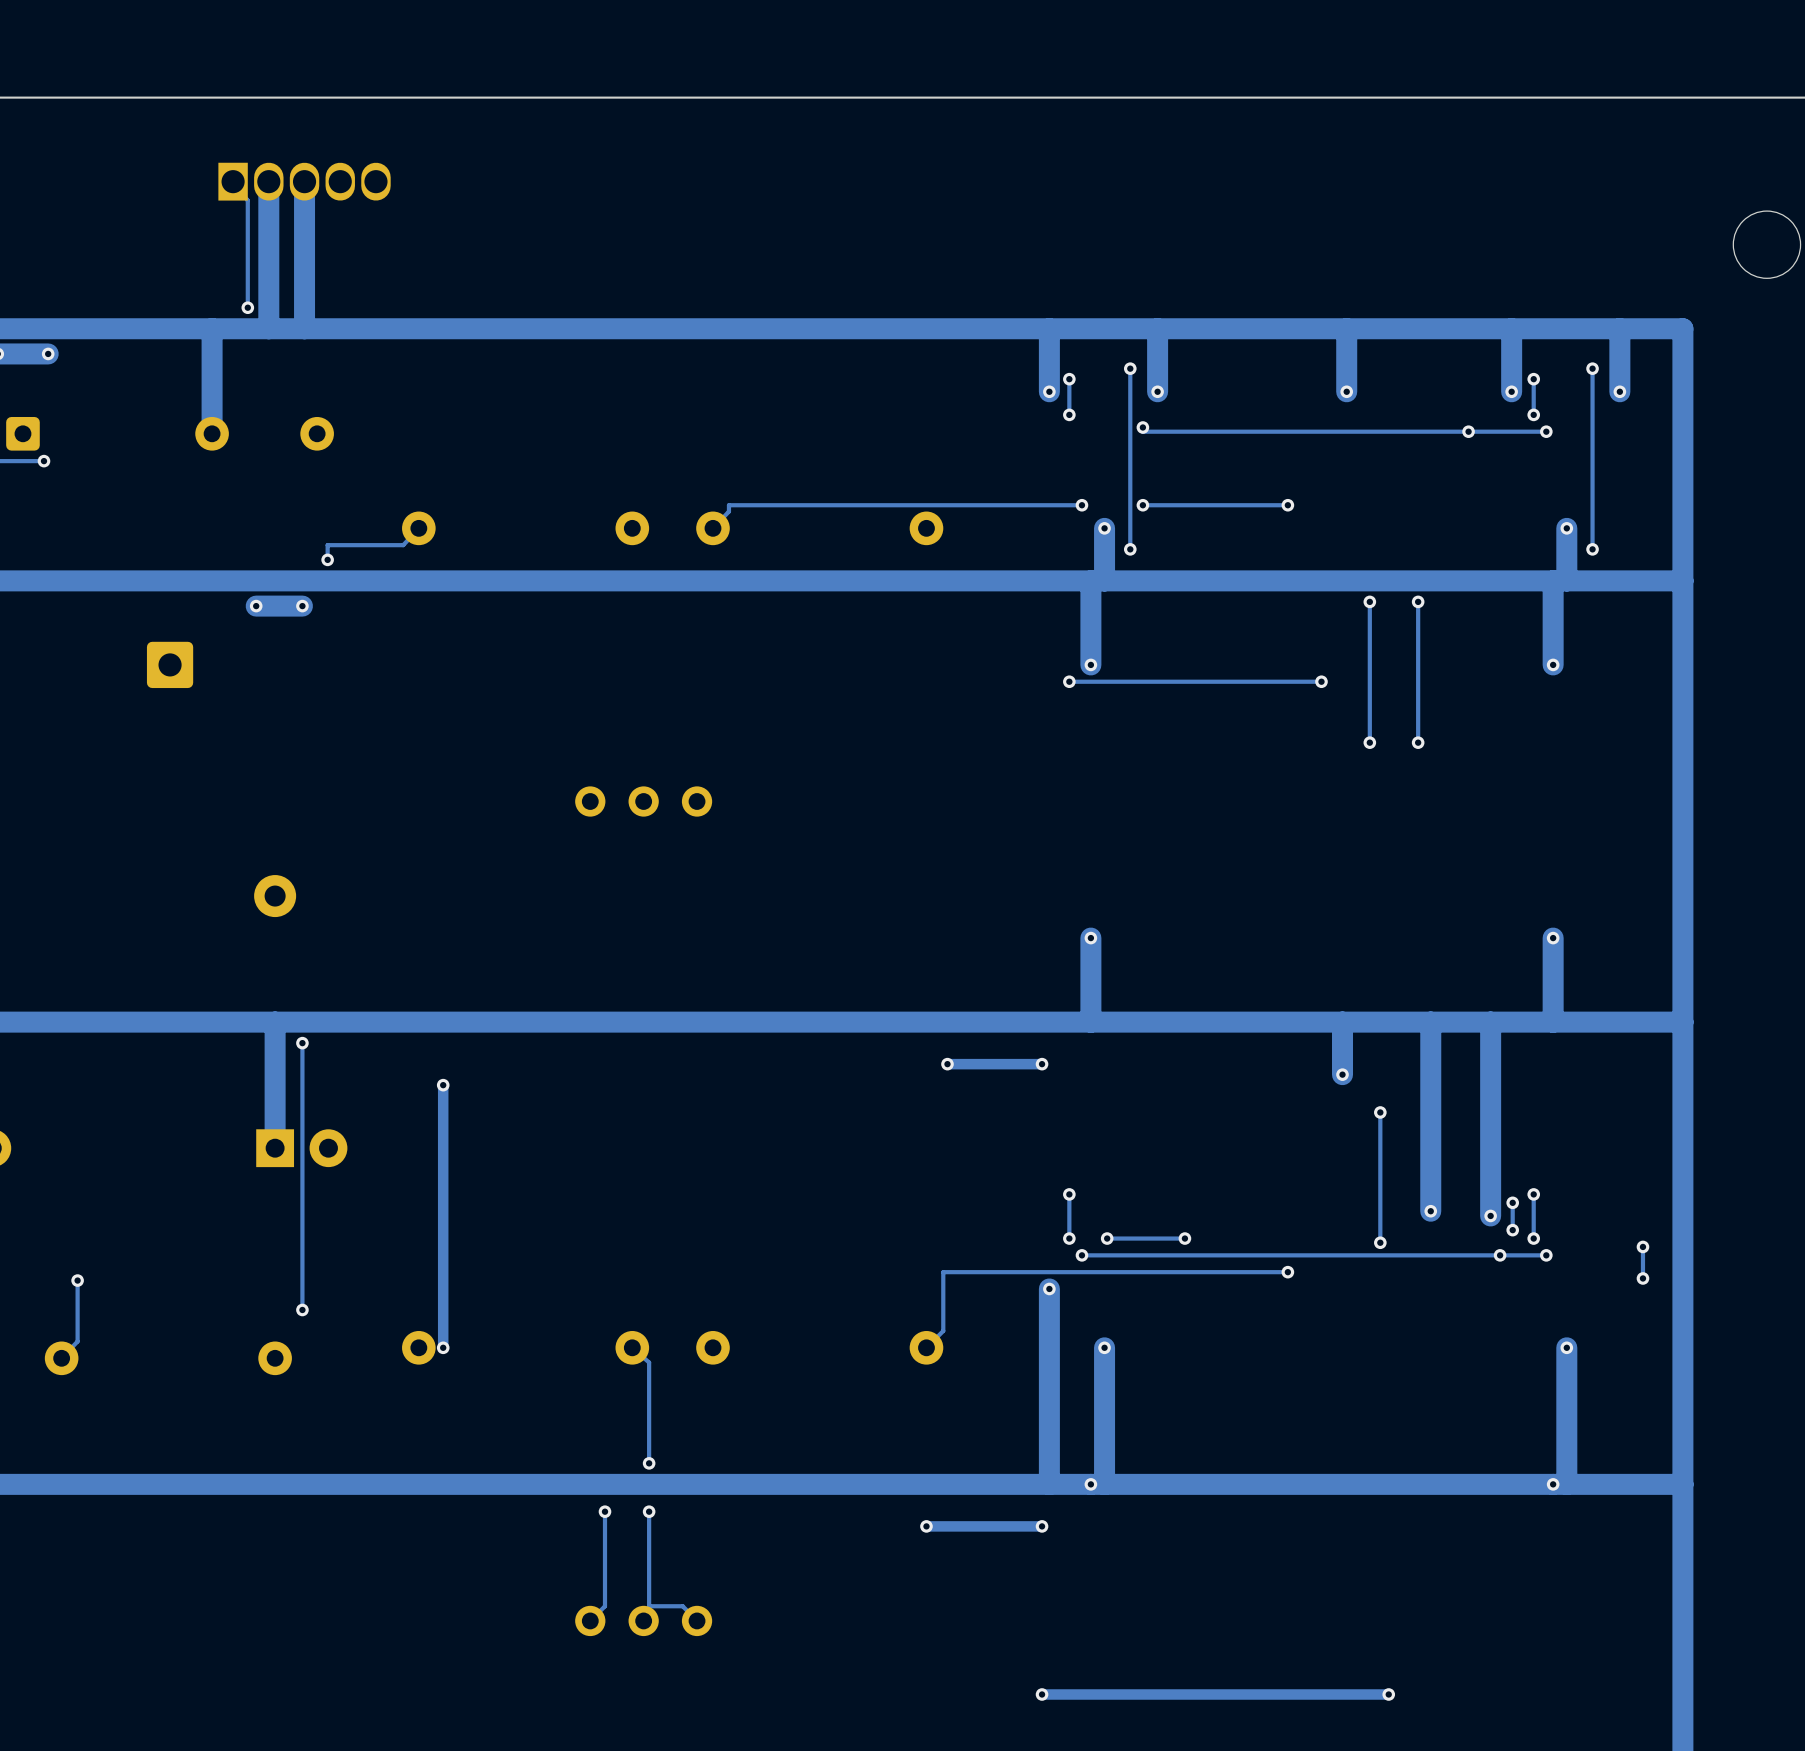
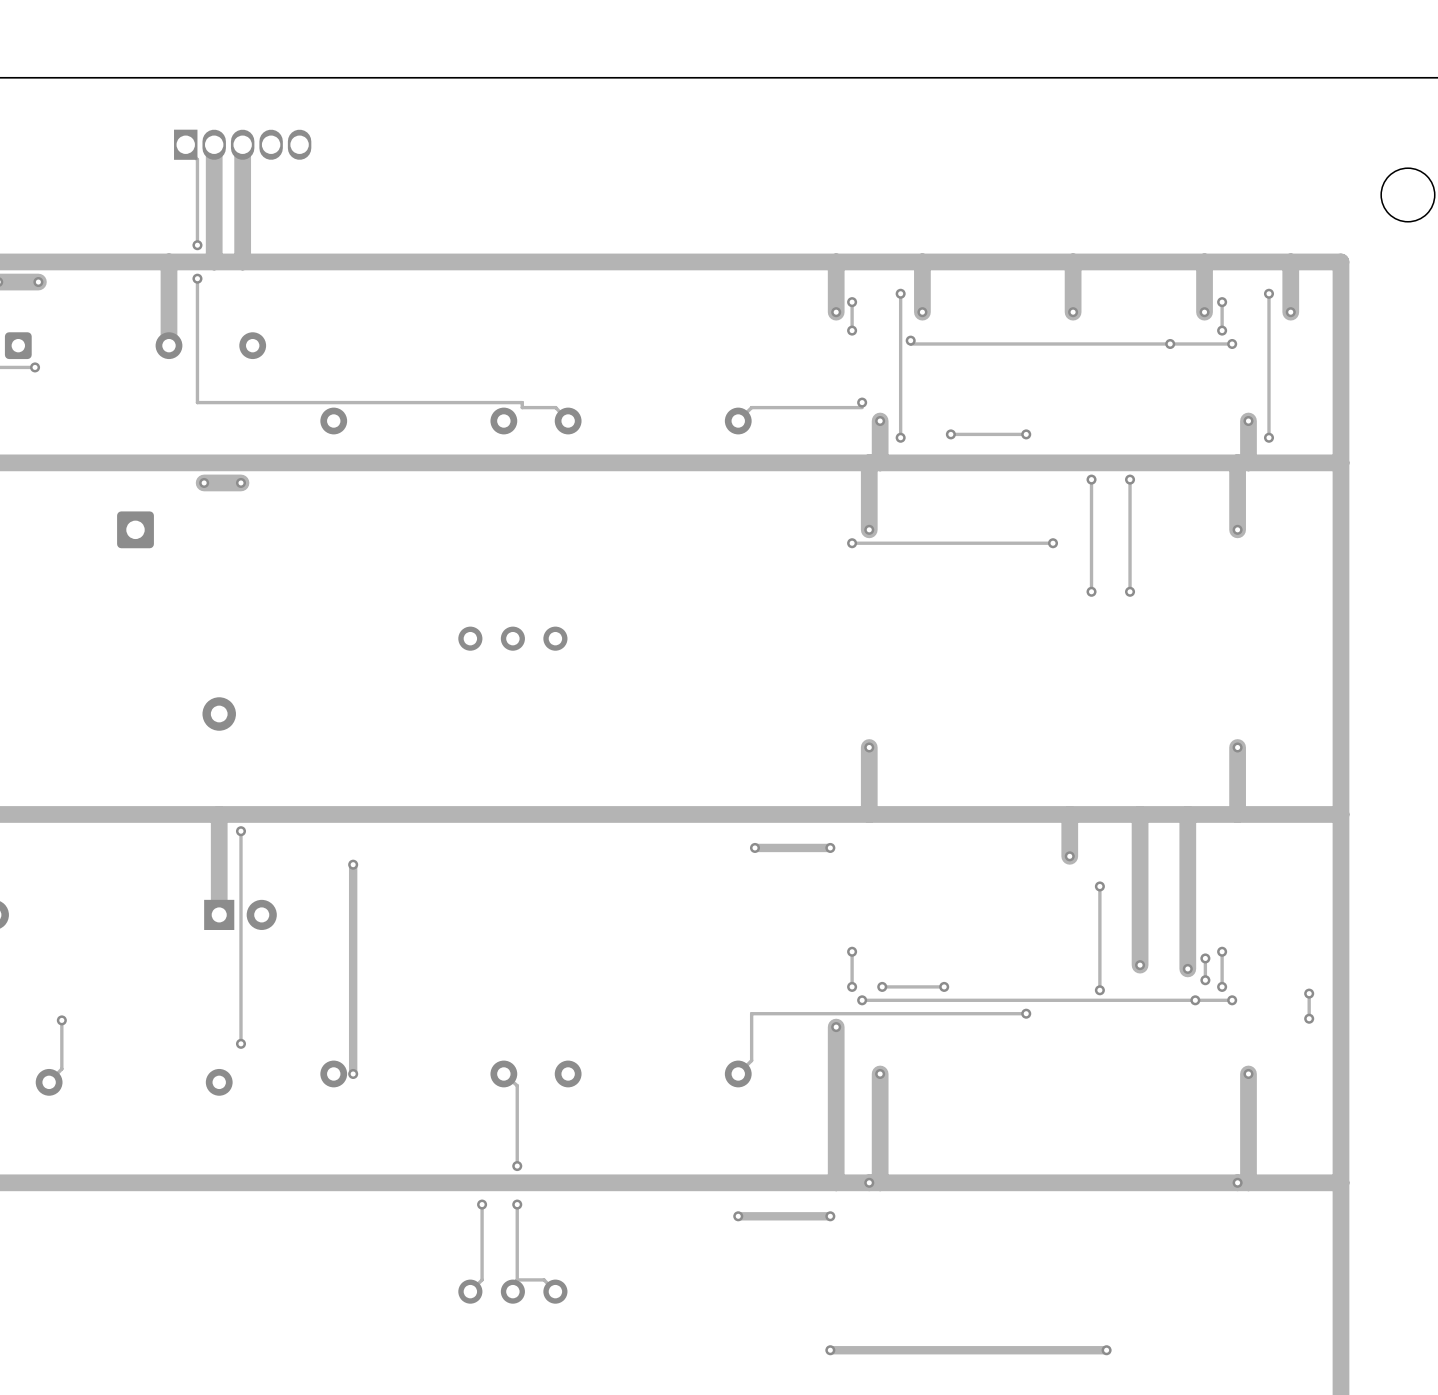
via: none -> (197, 278)
track: (1081, 505) (728, 505) (728, 511) (713, 528) -> (197, 278) (197, 402) (522, 402) (522, 407) (555, 407) (568, 421)
via: (1142, 505) -> none
track: (1287, 505) (1142, 505) -> none
via position: (1287, 505) -> (1026, 434)
track: none -> (862, 407) (751, 407) (738, 421)
track: (418, 528) (403, 545) (327, 545) (327, 559) -> none
via: none -> (950, 434)
track: none -> (1026, 434) (950, 434)
via: (327, 559) -> none

